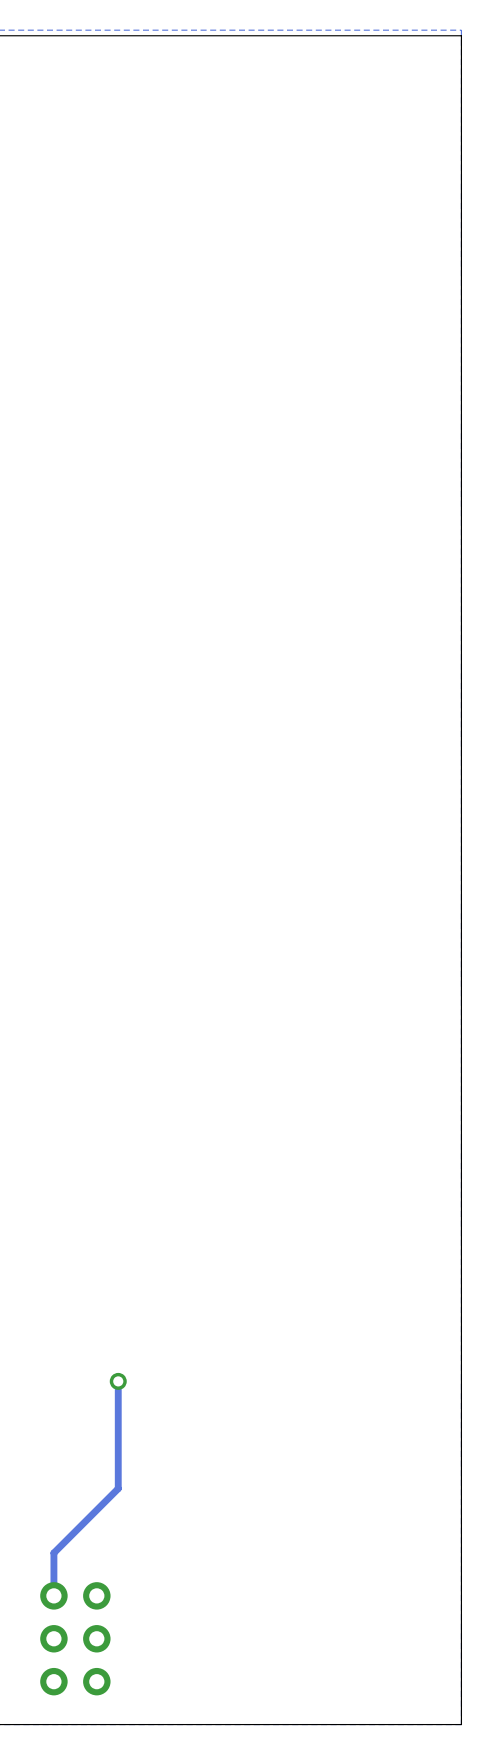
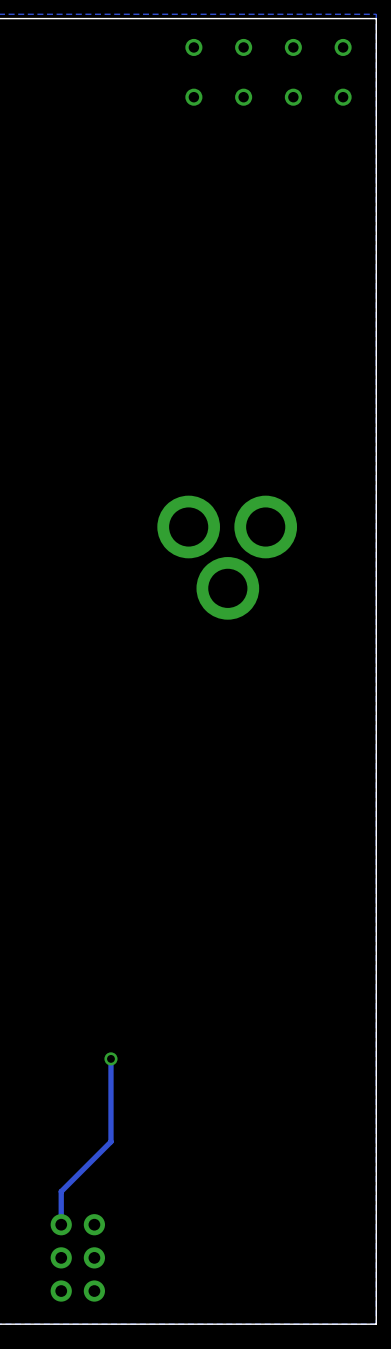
part: none -> (193, 47)
part: none -> (243, 47)
part: none -> (293, 47)
part: none -> (343, 47)
part: none -> (193, 97)
part: none -> (243, 97)
part: none -> (293, 97)
part: none -> (343, 97)
part: none -> (227, 557)

